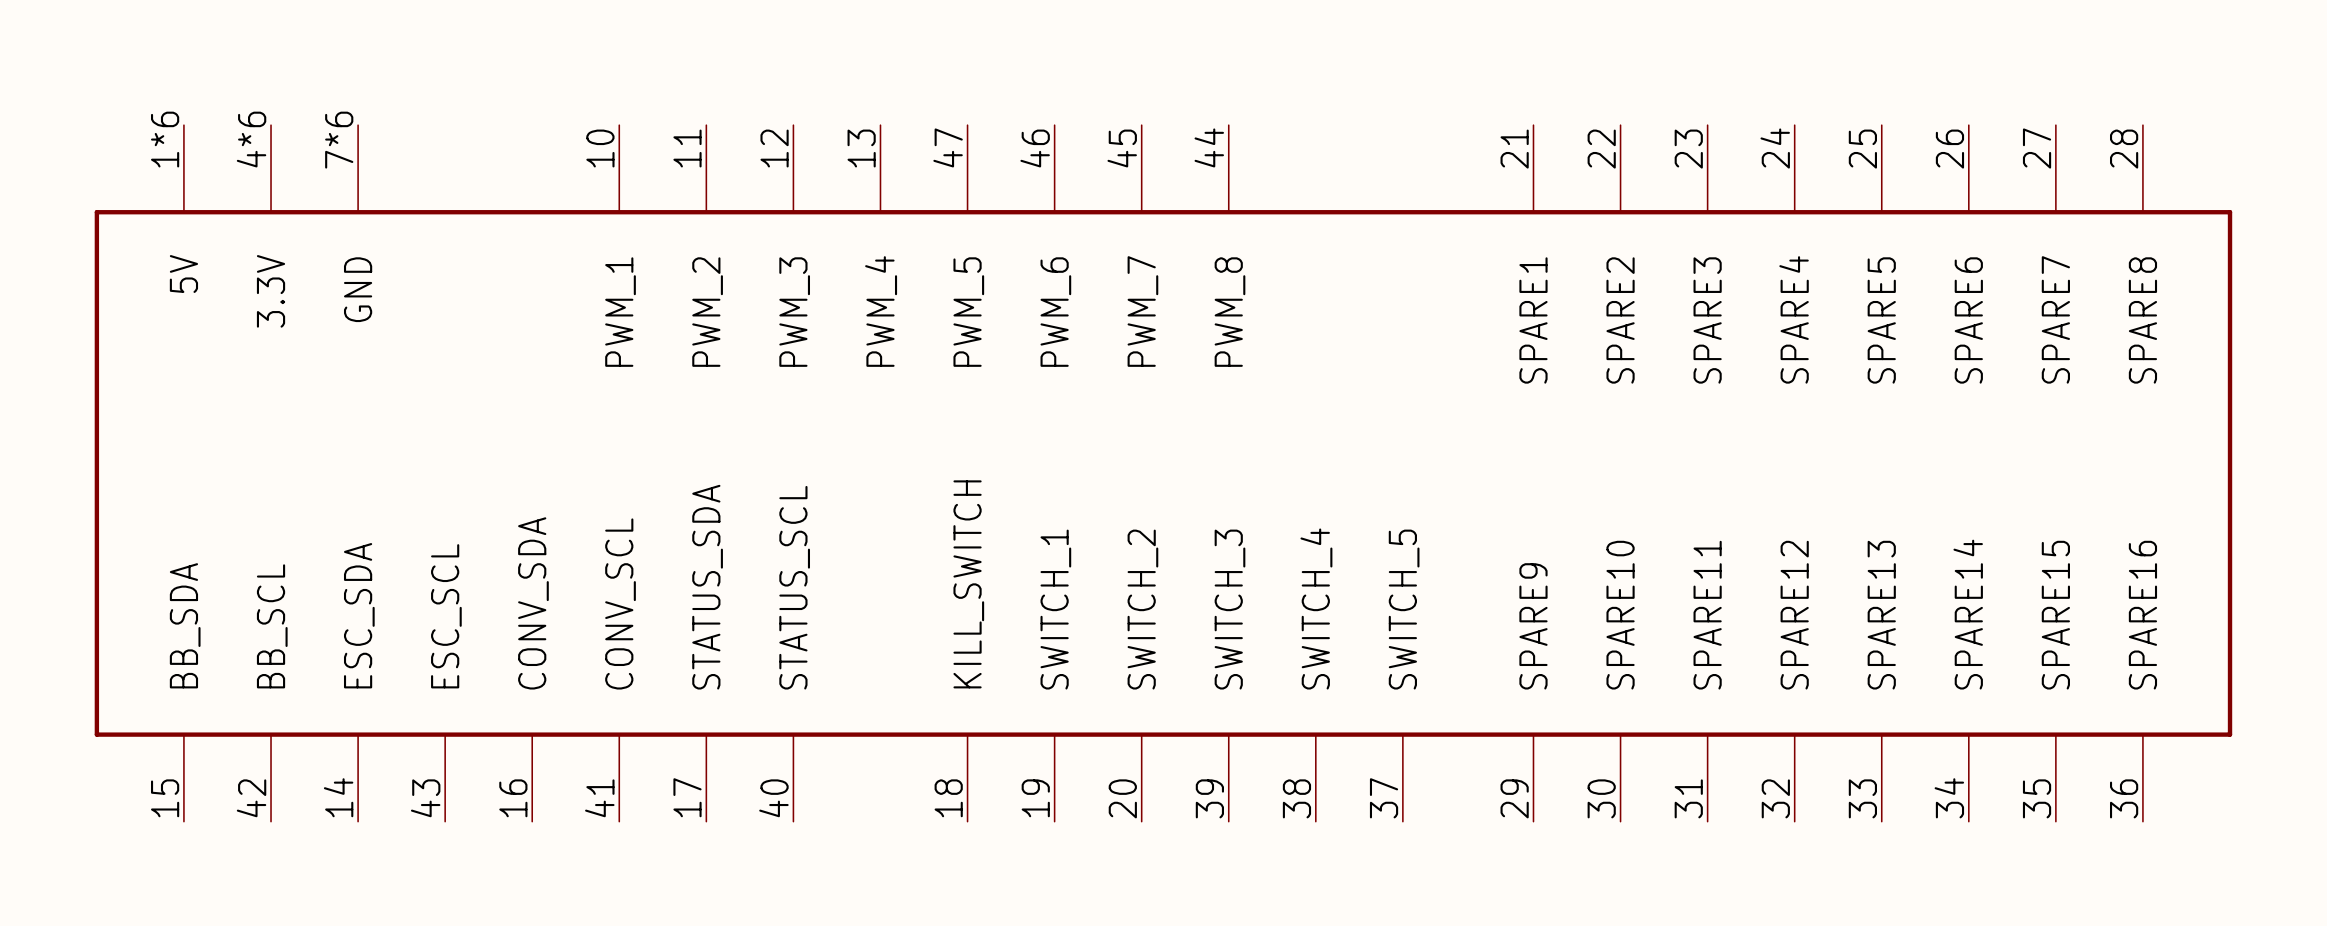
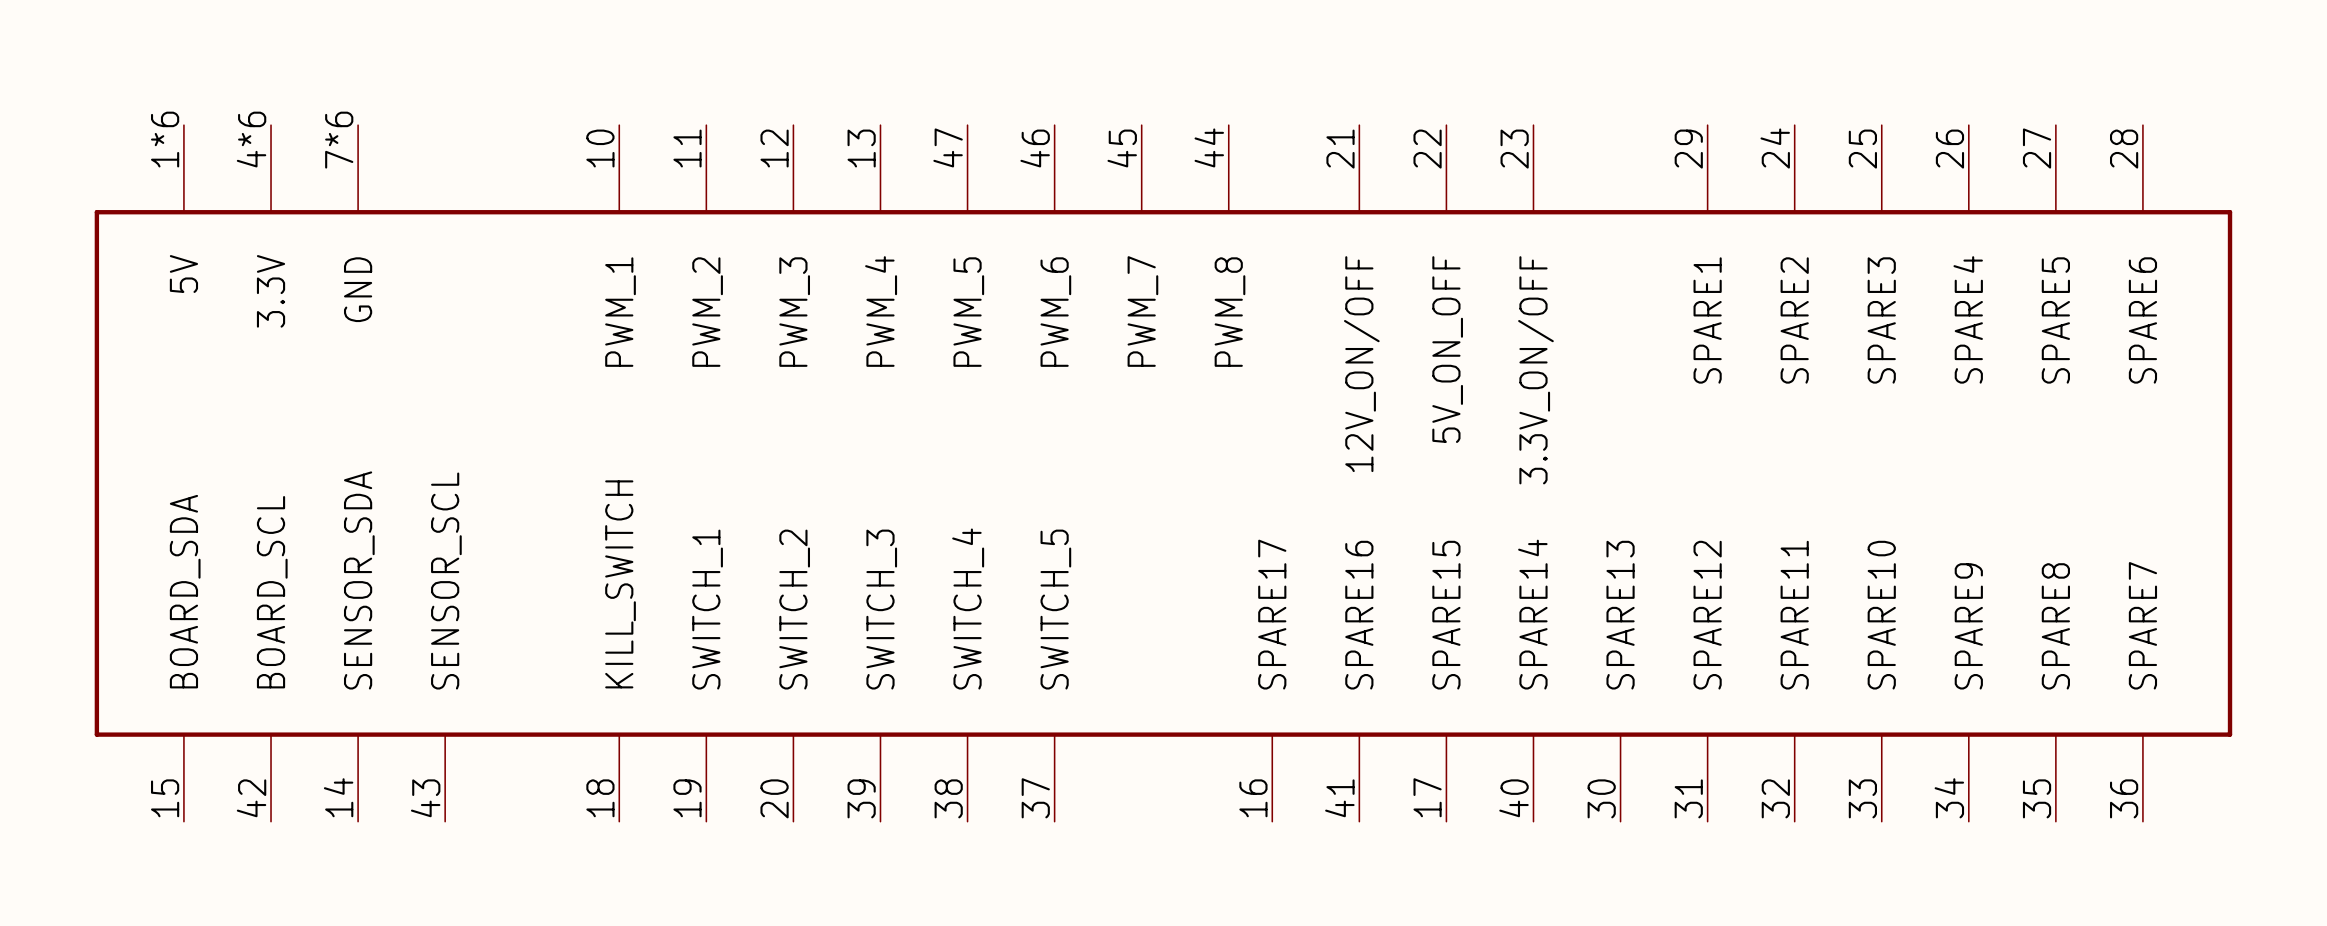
part symbol: [94, 125, 2233, 822] -> [94, 125, 2233, 822]

